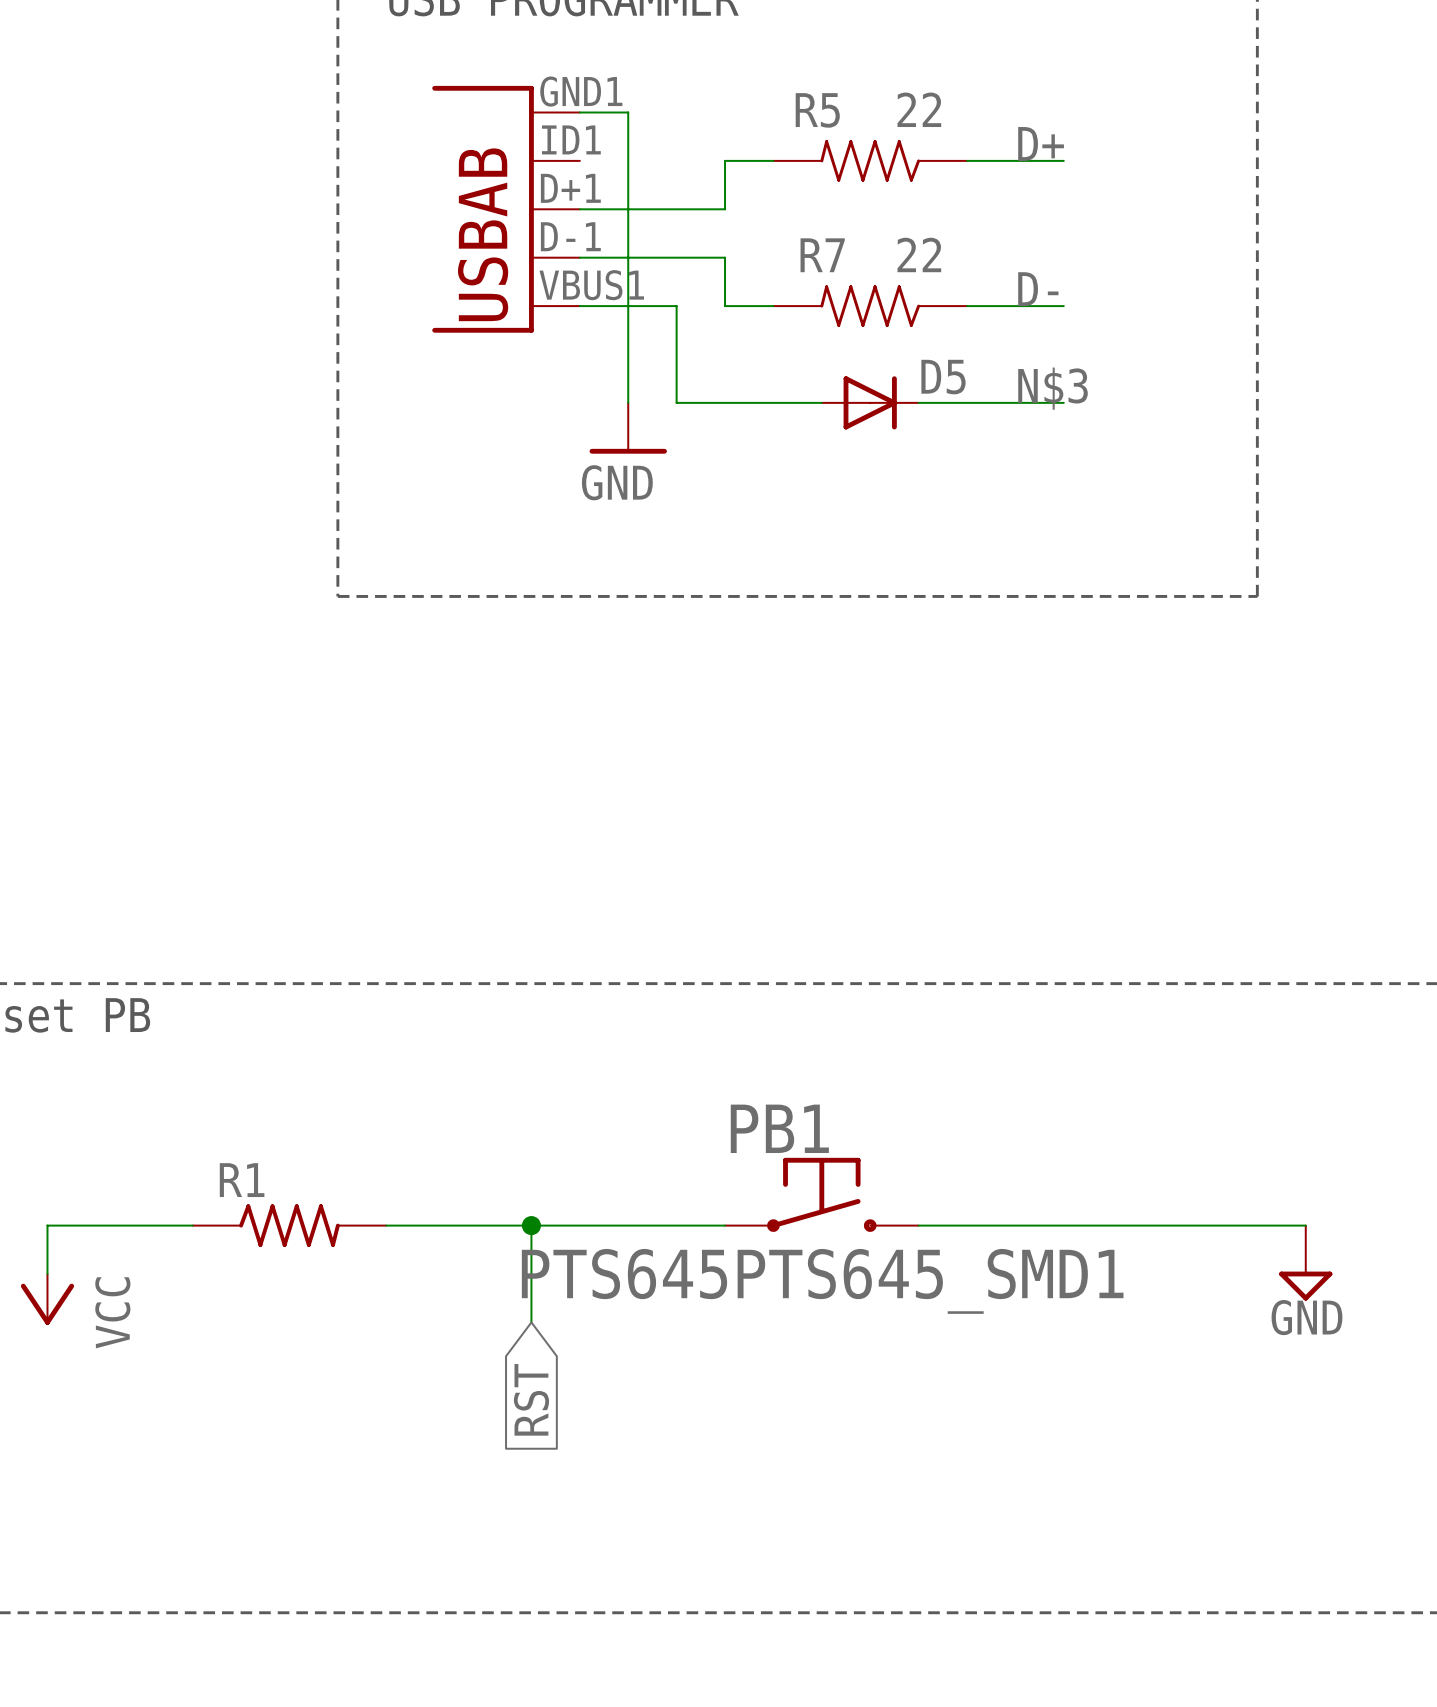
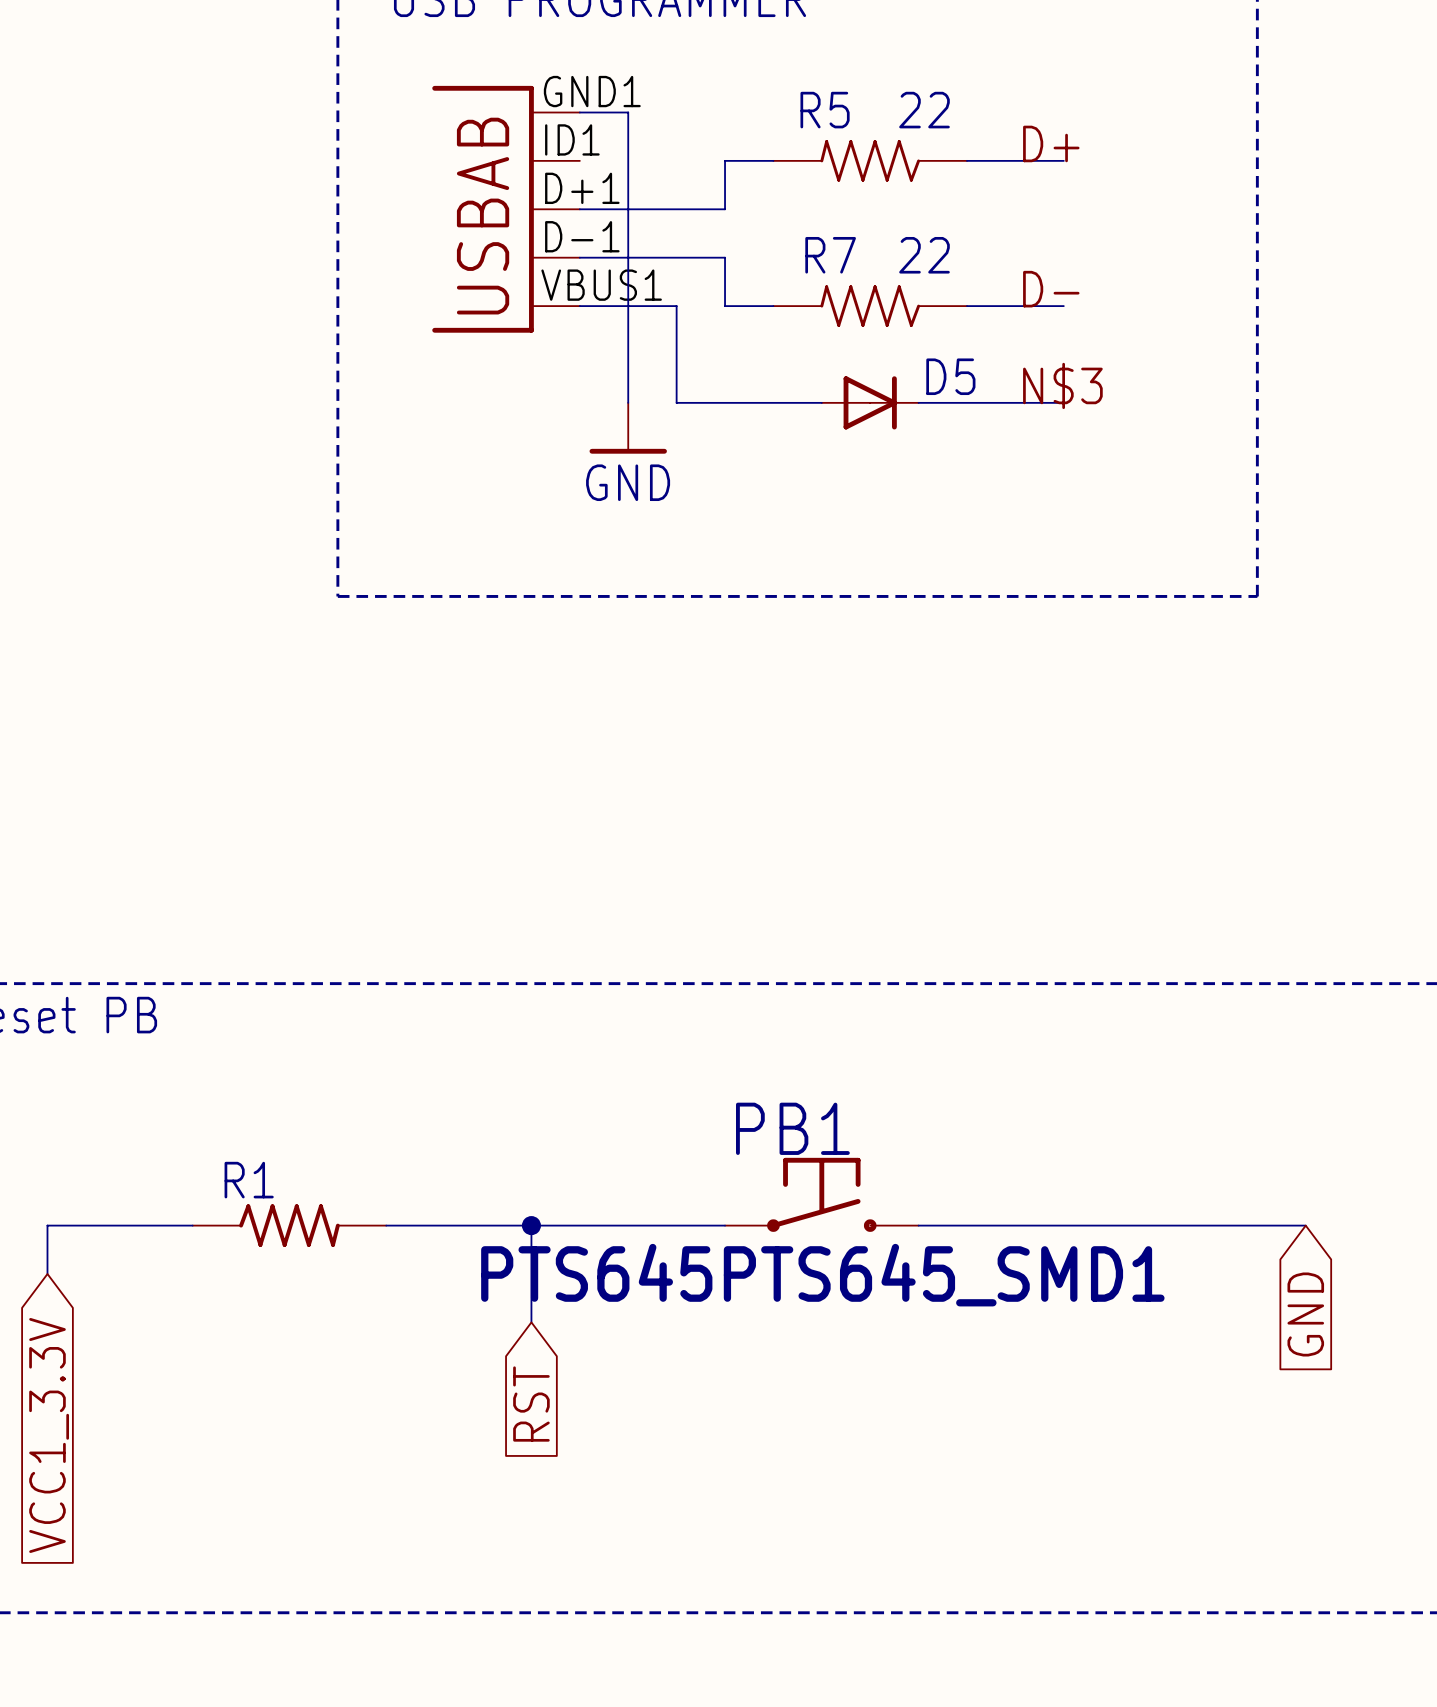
power symbol: GND (1305, 1263) -> none
power symbol: VCC (47, 1299) -> none
global label: none -> GND (1305, 1314)
global label: none -> VCC1_3.3V (49, 1435)

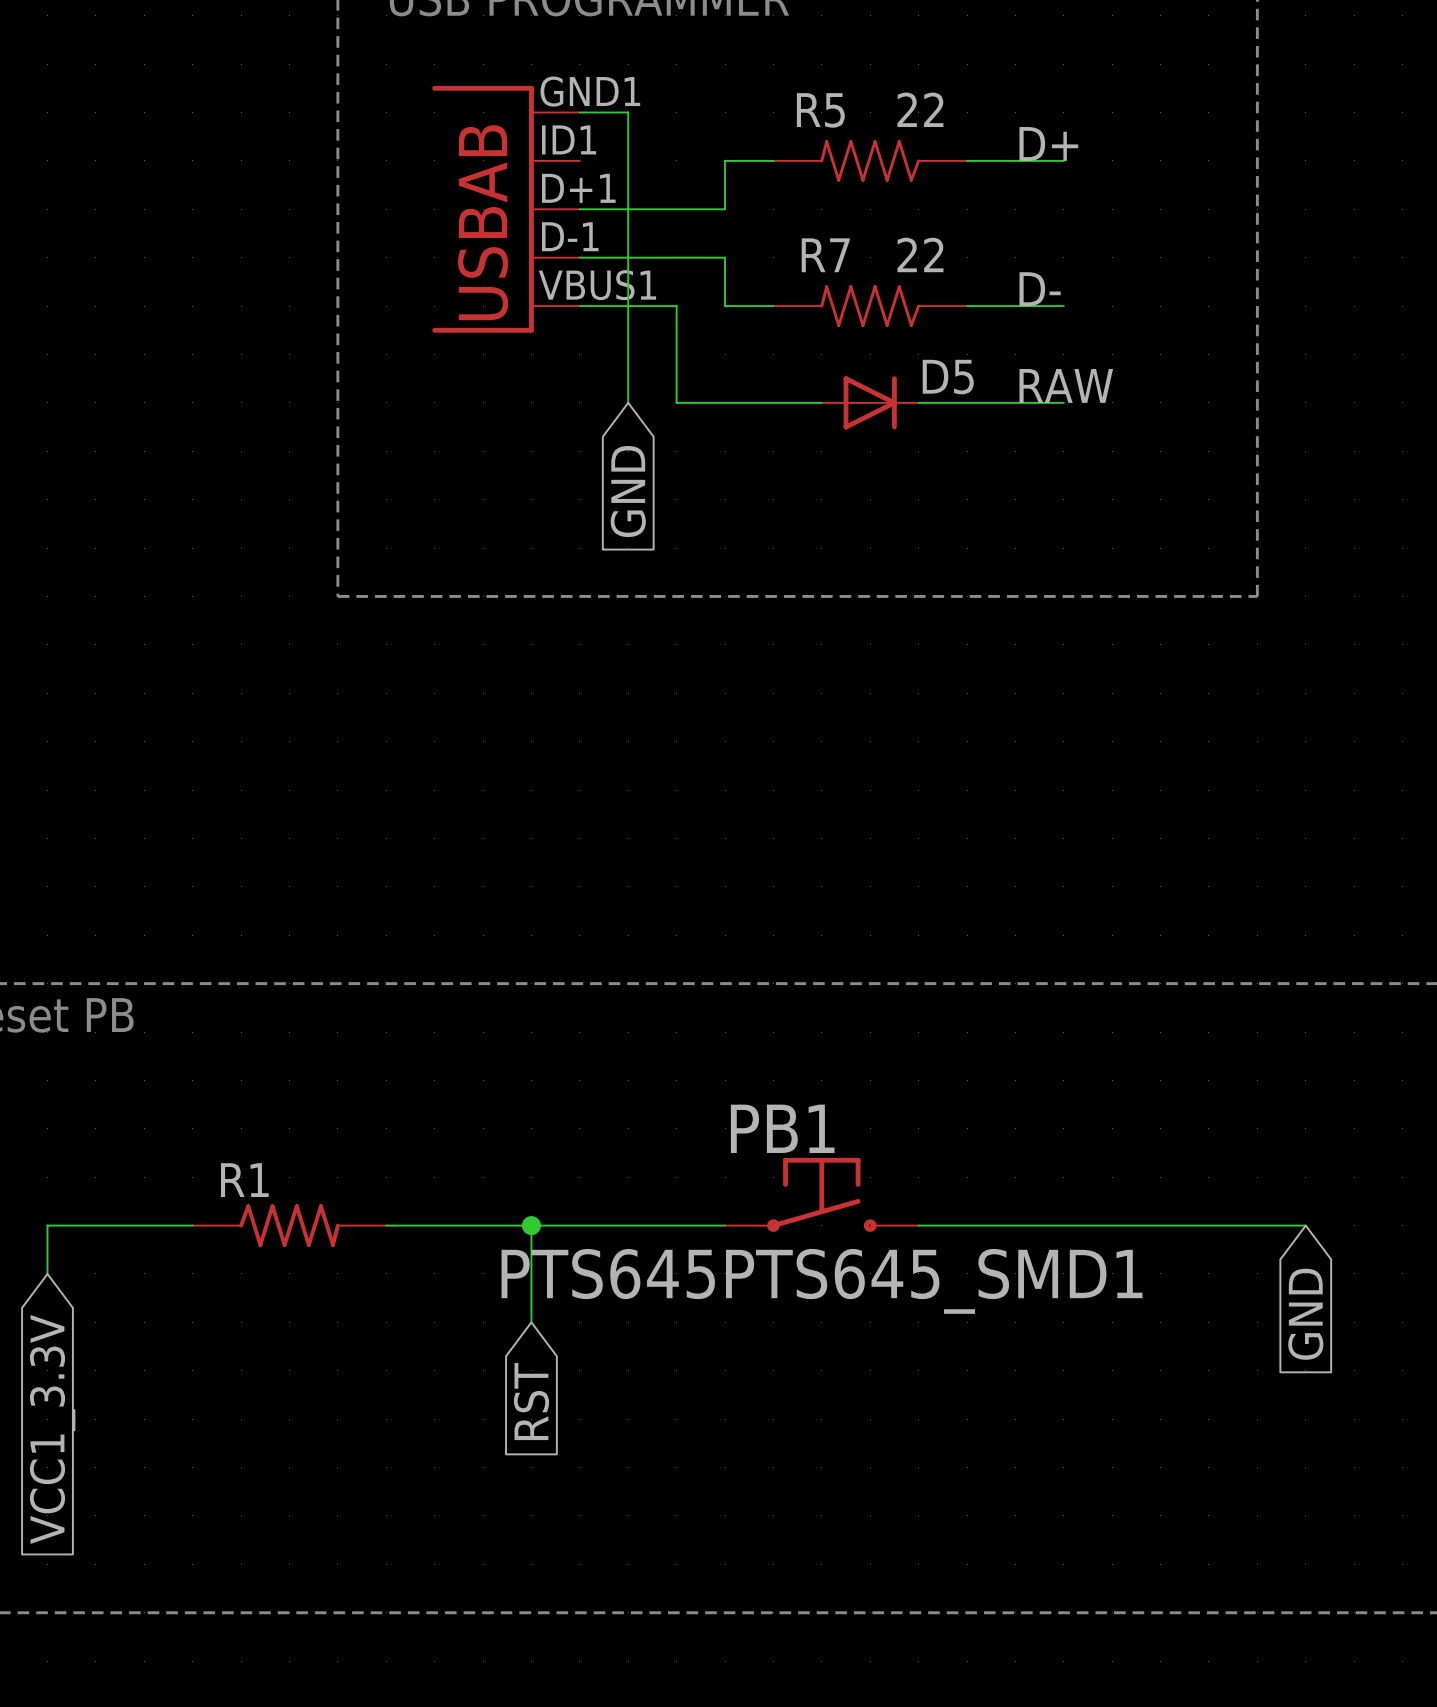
label: N$3 (1062, 385) -> RAW (1066, 385)
power symbol: GND (628, 428) -> none
global label: none -> GND (628, 491)

